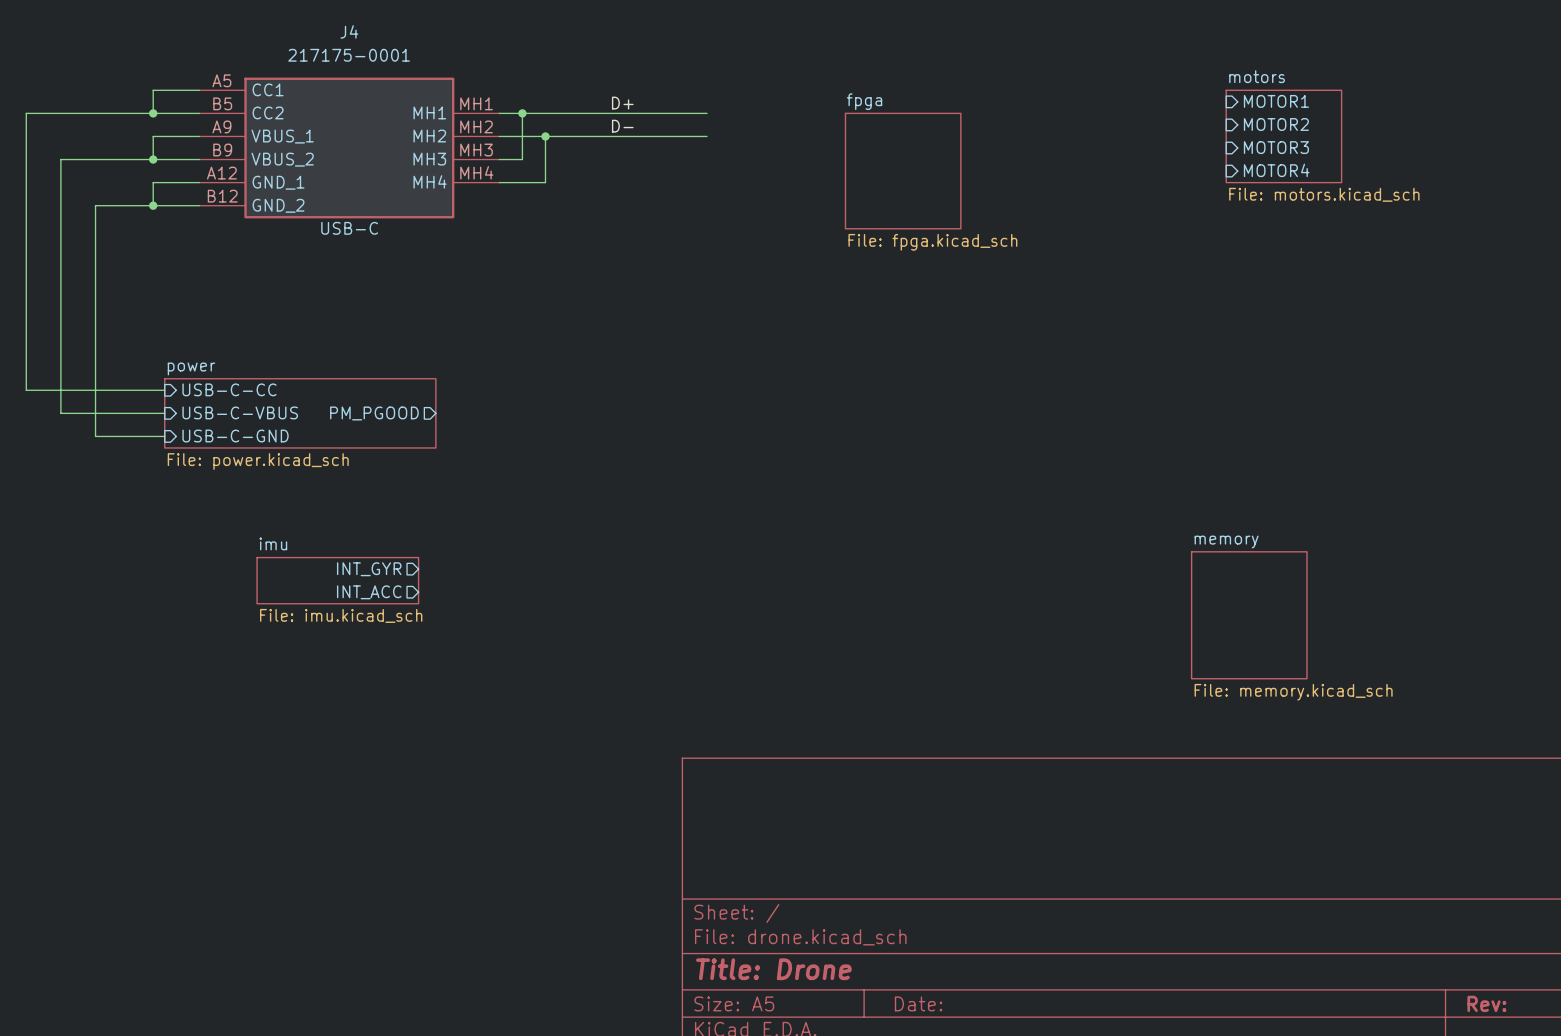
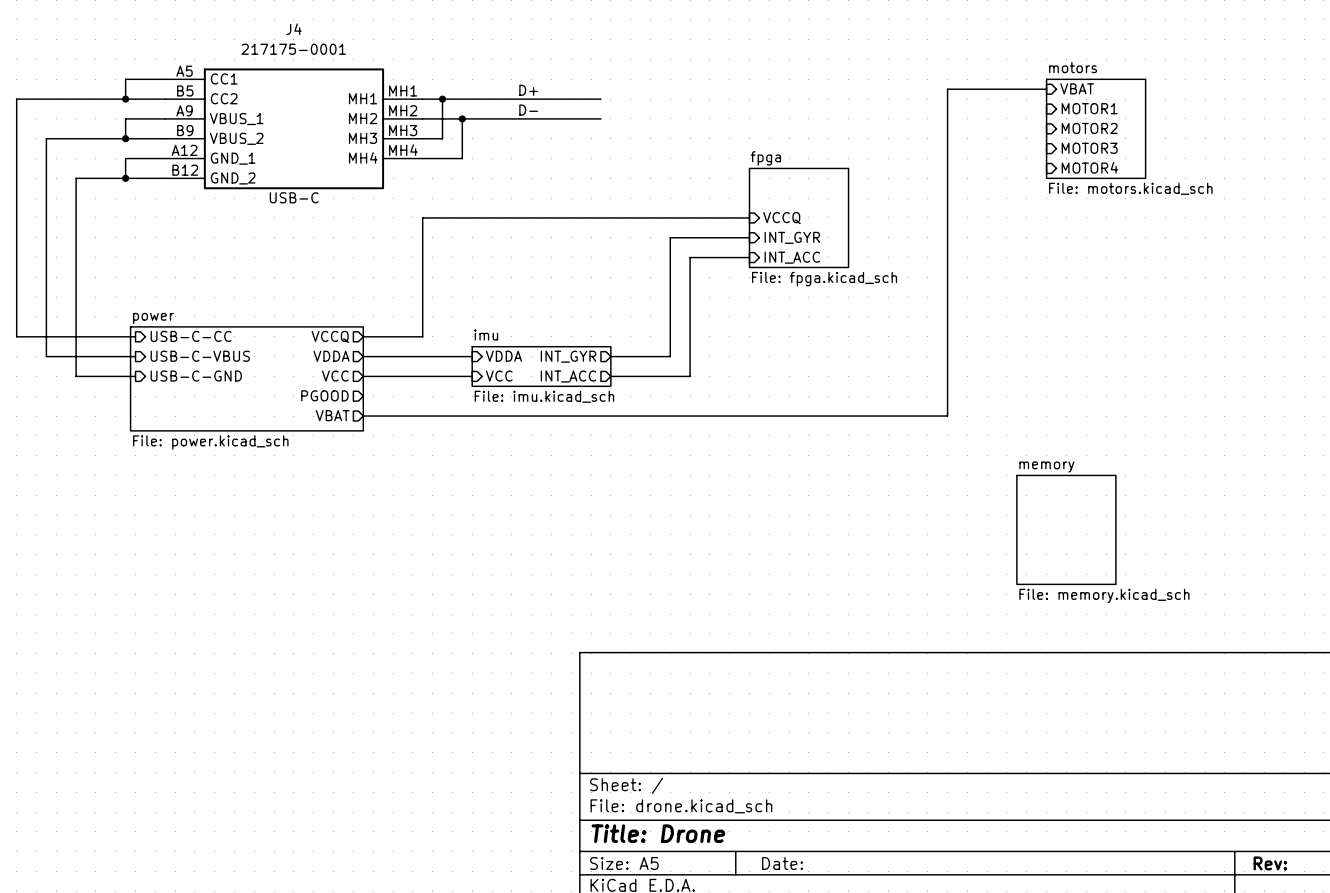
wire: none -> (1046, 89) (947, 89) (947, 416) (363, 416)
sheet pin: MOTOR1 (1276, 101) -> VBAT (1077, 88)
sheet pin: MOTOR2 (1276, 124) -> MOTOR1 (1089, 108)
sheet motors: File: motors.kicad_sch (1283, 136) -> none
sheet pin: MOTOR3 (1276, 147) -> MOTOR2 (1089, 128)
sheet motors: none -> File: motors.kicad_sch (1096, 128)
sheet pin: MOTOR4 (1276, 170) -> MOTOR3 (1089, 148)
sheet fpga position: (903, 171) -> (799, 217)
sheet pin: none -> MOTOR4 (1089, 167)
wire: none -> (749, 217) (422, 217) (422, 336) (363, 336)
sheet pin: none -> VCCQ (781, 218)
wire: none -> (749, 237) (670, 237) (670, 356) (610, 356)
sheet pin: none -> INT_GYR (792, 237)
wire: none -> (749, 257) (690, 257) (690, 376) (610, 376)
sheet pin: none -> INT_ACC (792, 257)
sheet pin: none -> VCCQ (330, 336)
sheet pin: none -> VDDA (503, 356)
sheet power: File: power.kicad_sch (300, 413) -> none
sheet pin: PM_PGOOD (374, 413) -> VDDA (331, 356)
wire: none -> (363, 356) (472, 356)
sheet pin: none -> INT_GYR (568, 356)
sheet imu: none -> File: imu.kicad_sch (541, 366)
sheet pin: none -> VCC (335, 376)
wire: none -> (363, 376) (472, 376)
sheet pin: none -> VCC (499, 376)
sheet pin: none -> INT_ACC (568, 376)
sheet power: none -> File: power.kicad_sch (246, 378)
sheet pin: none -> PGOOD (324, 395)
sheet pin: none -> VBAT (332, 415)
sheet pin: INT_GYR (369, 569) -> none
sheet imu: File: imu.kicad_sch (337, 580) -> none
sheet pin: INT_ACC (369, 592) -> none

